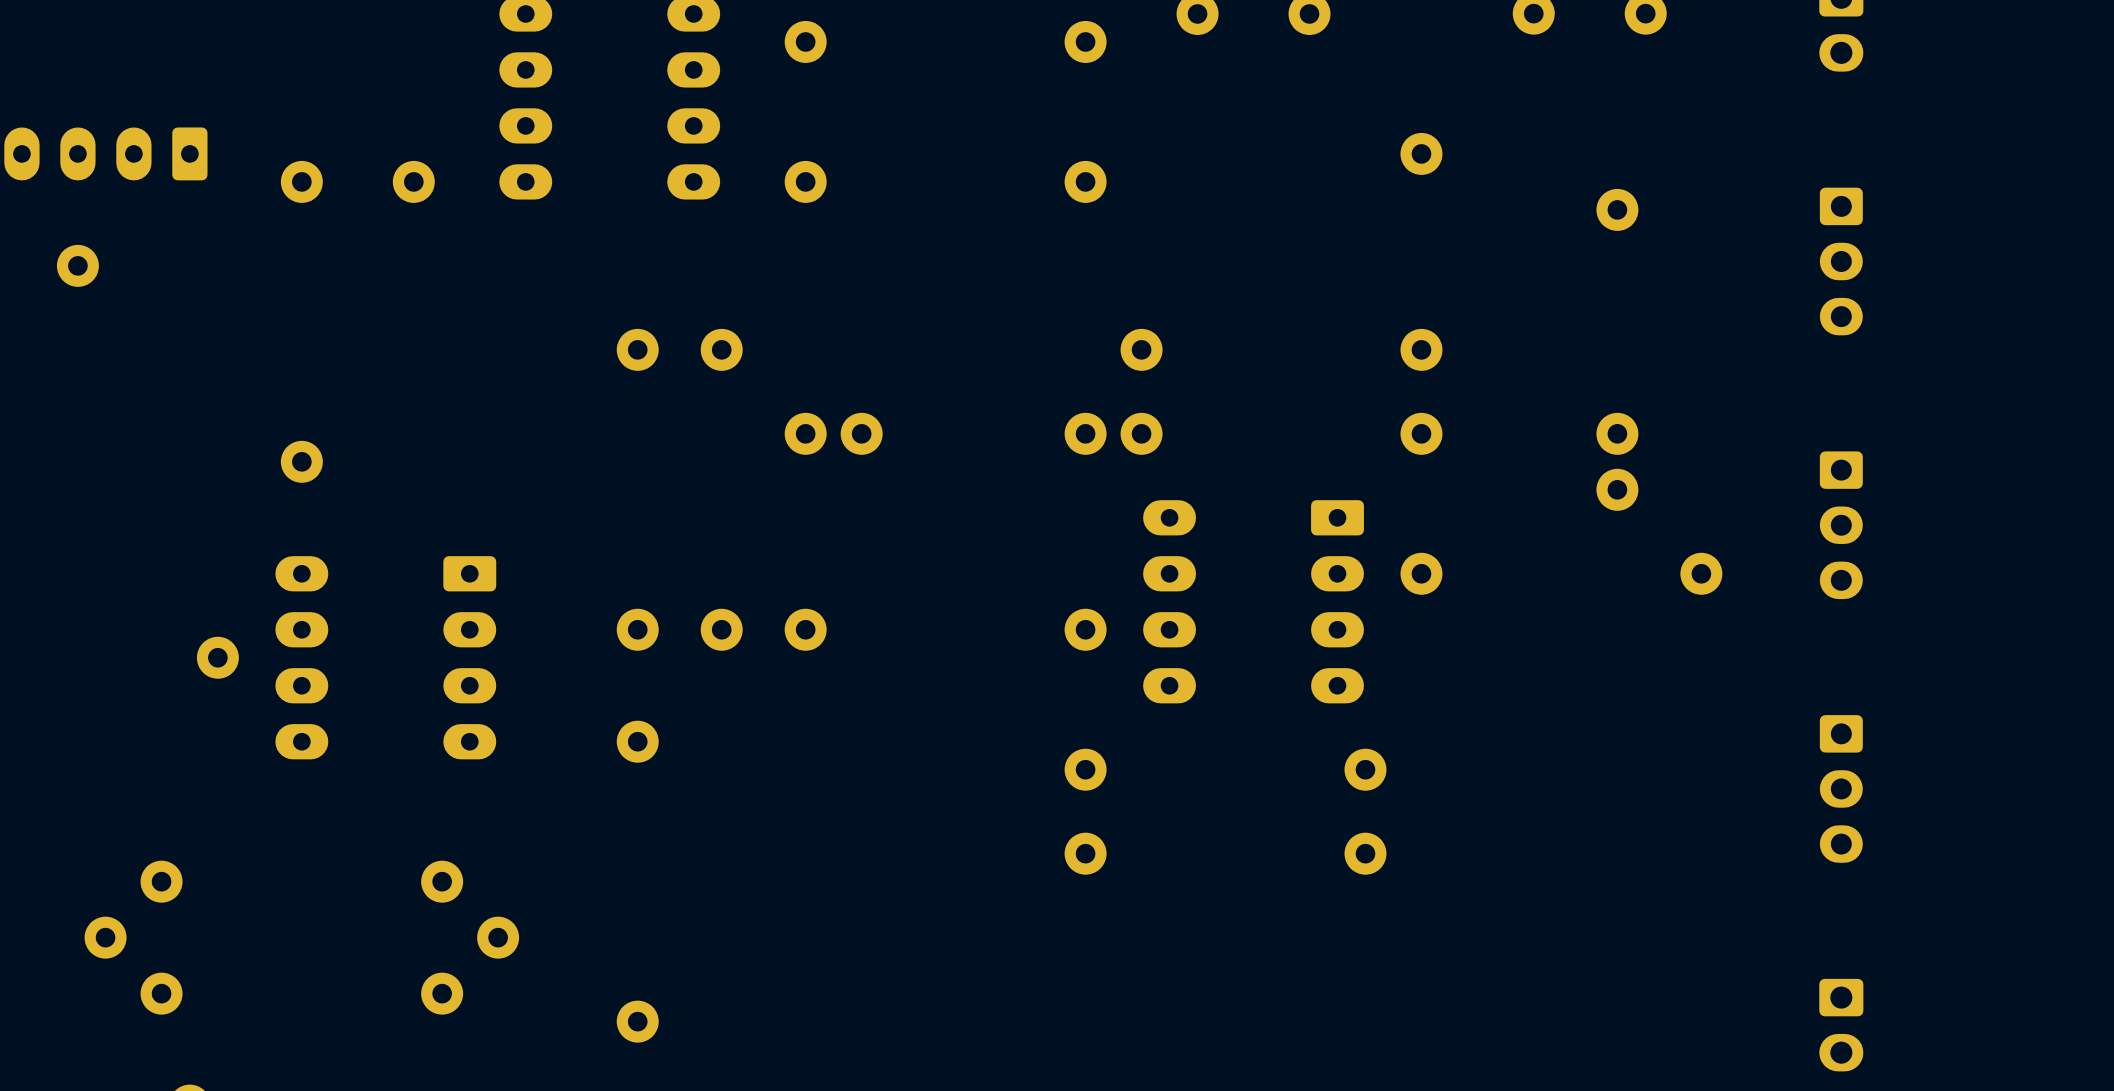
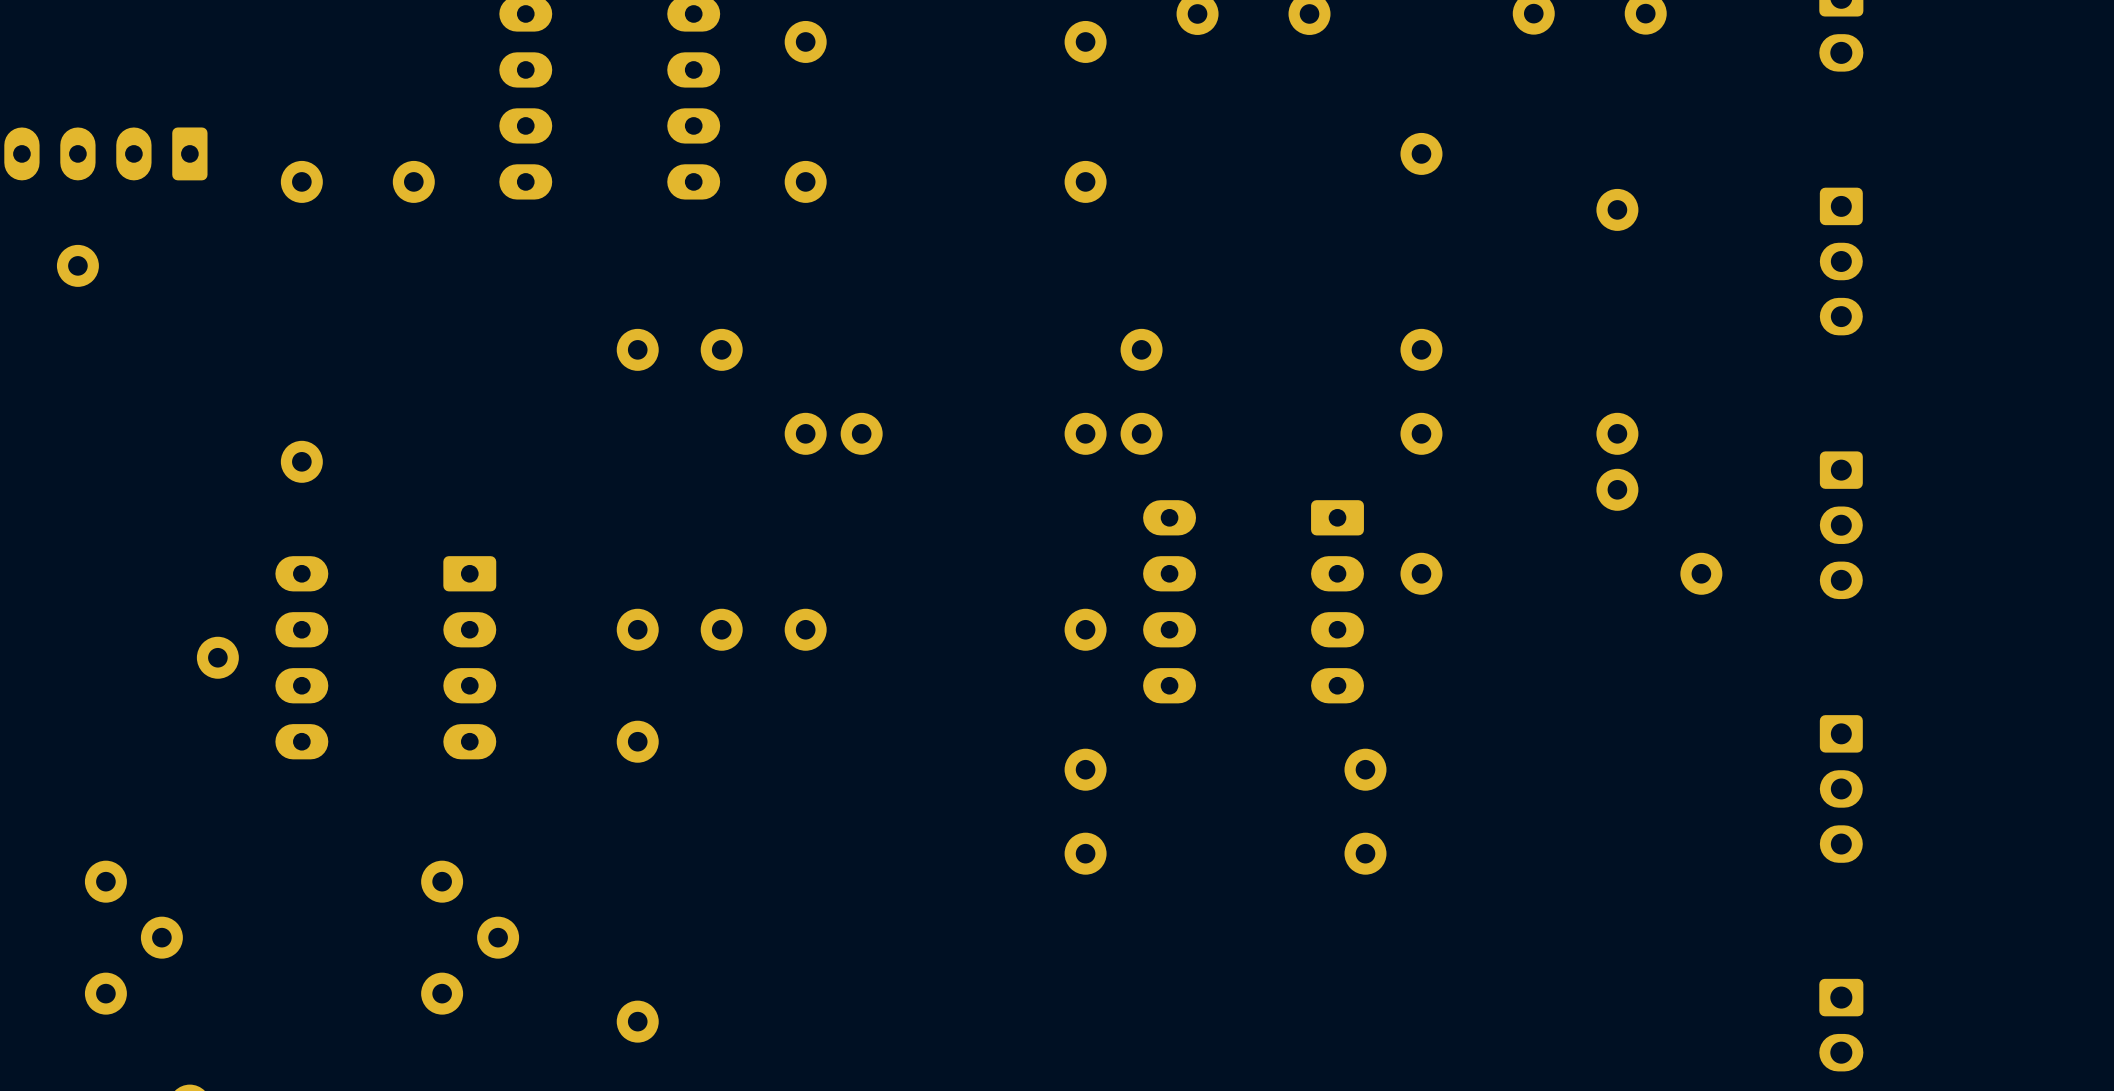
part rotation: 0° (133, 937) -> 180° (133, 937)

